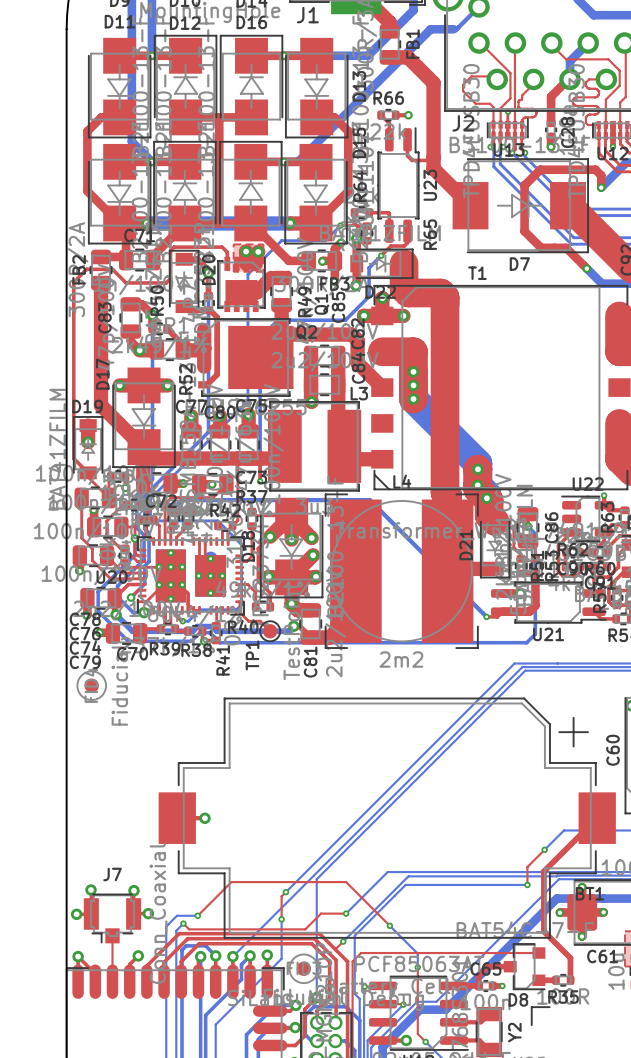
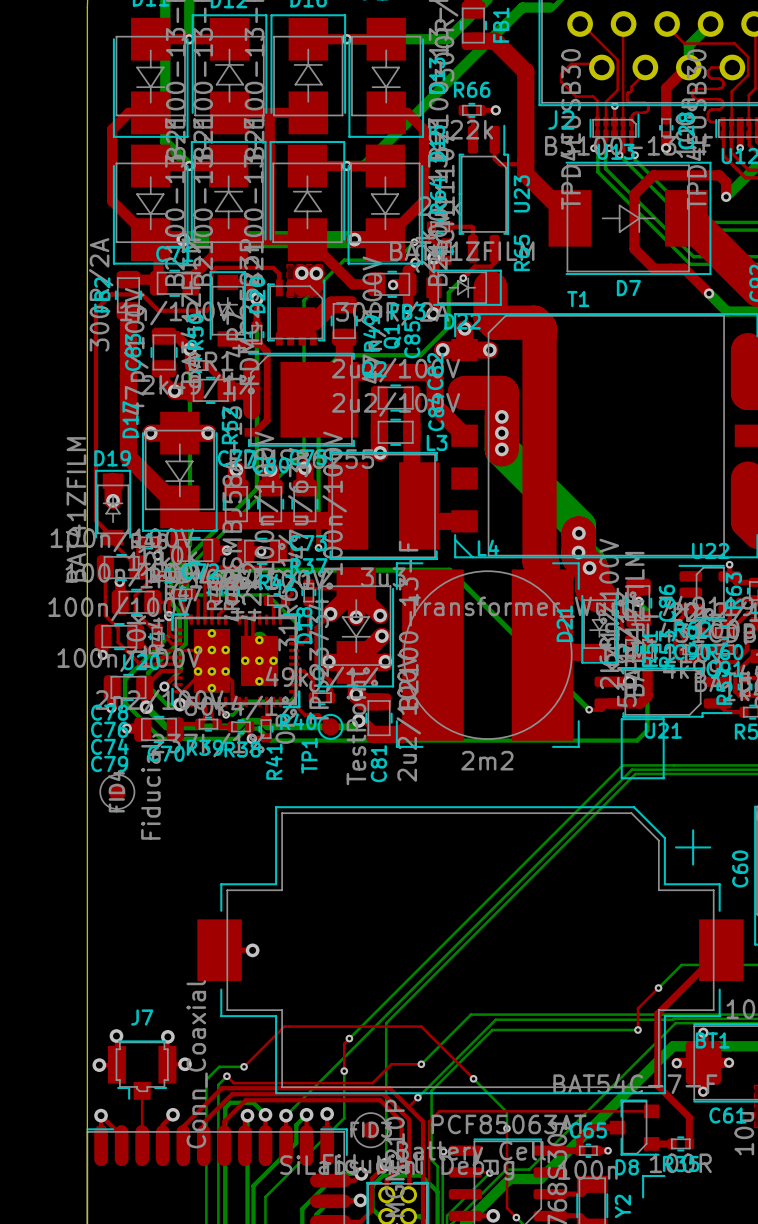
line: none -> (621, 719) (663, 719) (663, 778) (621, 778) (621, 719)

